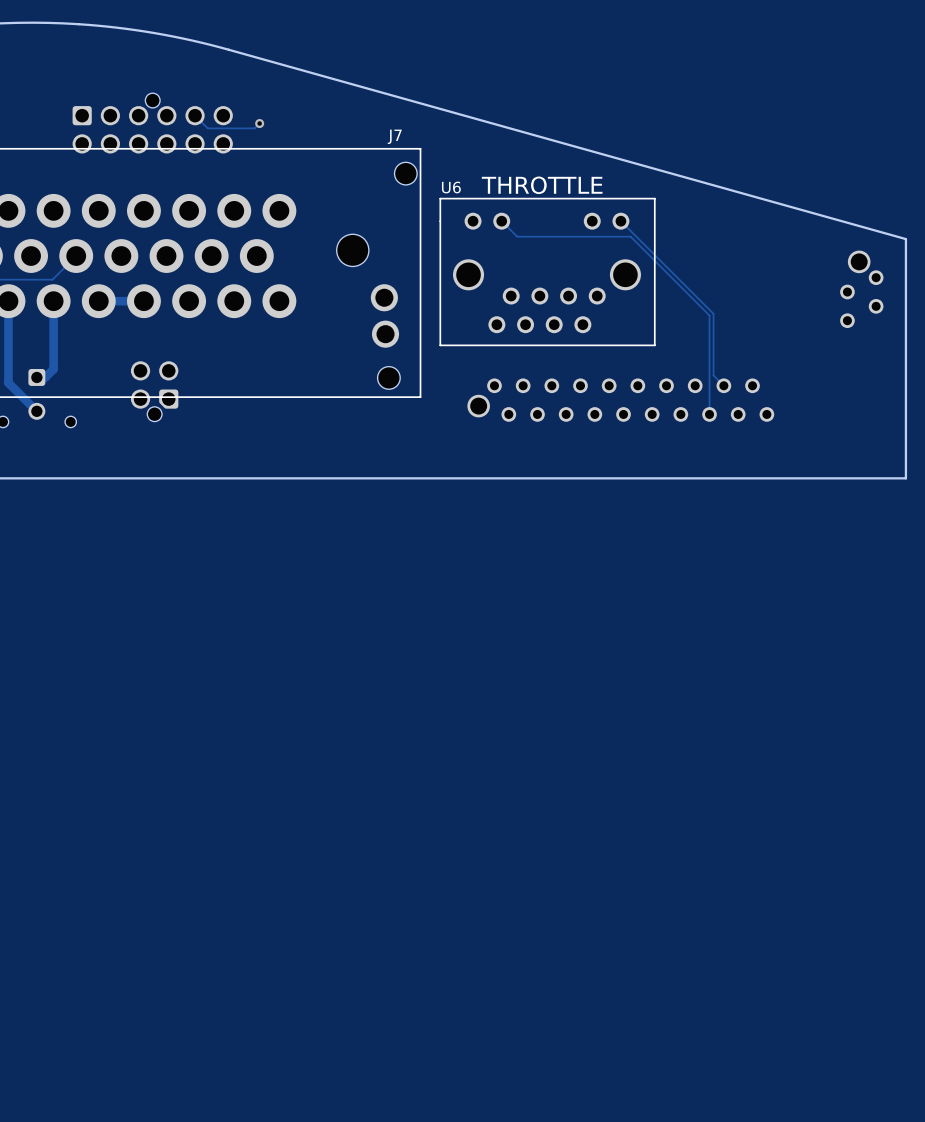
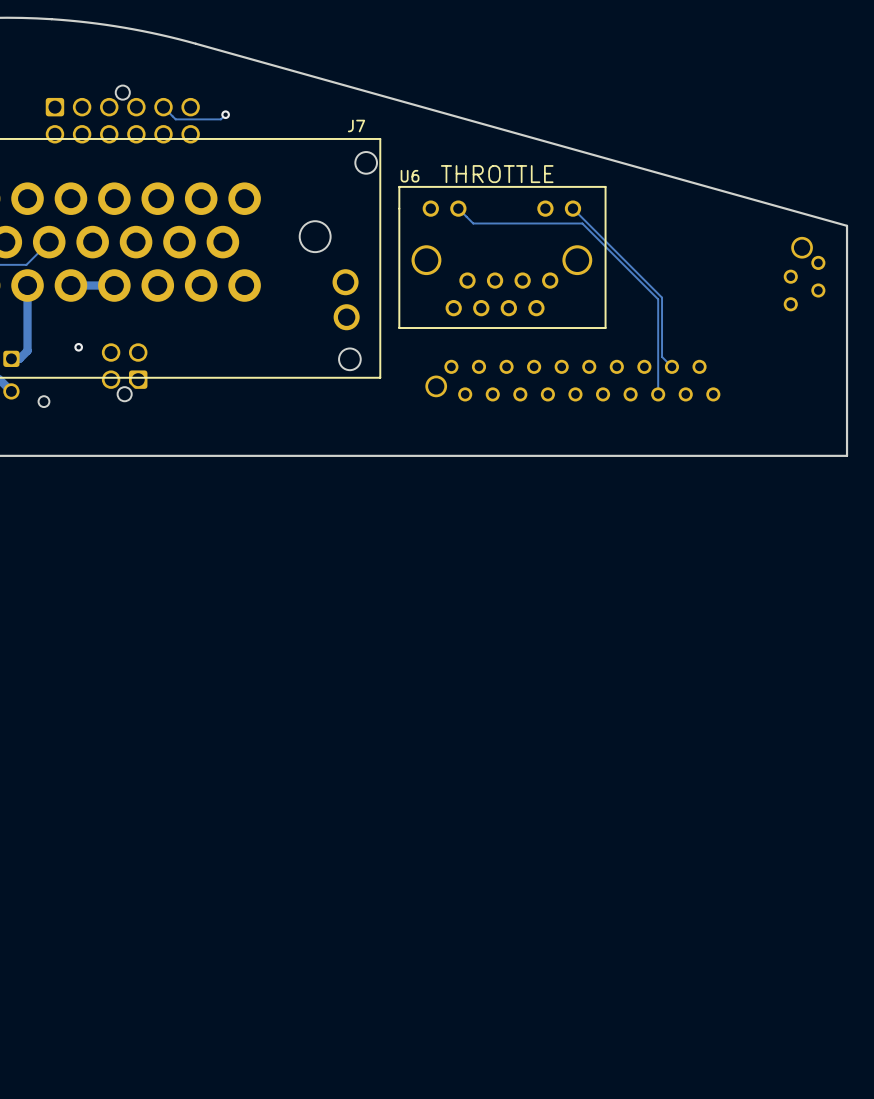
via: none -> (78, 347)

